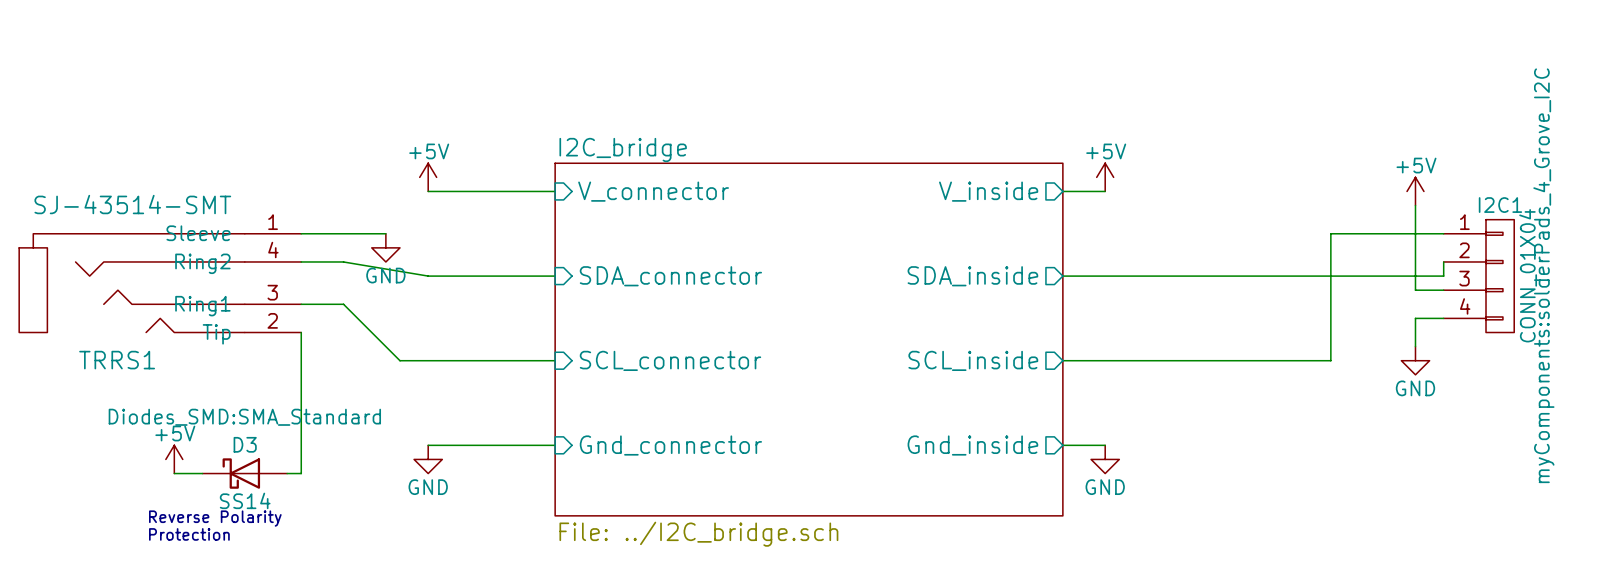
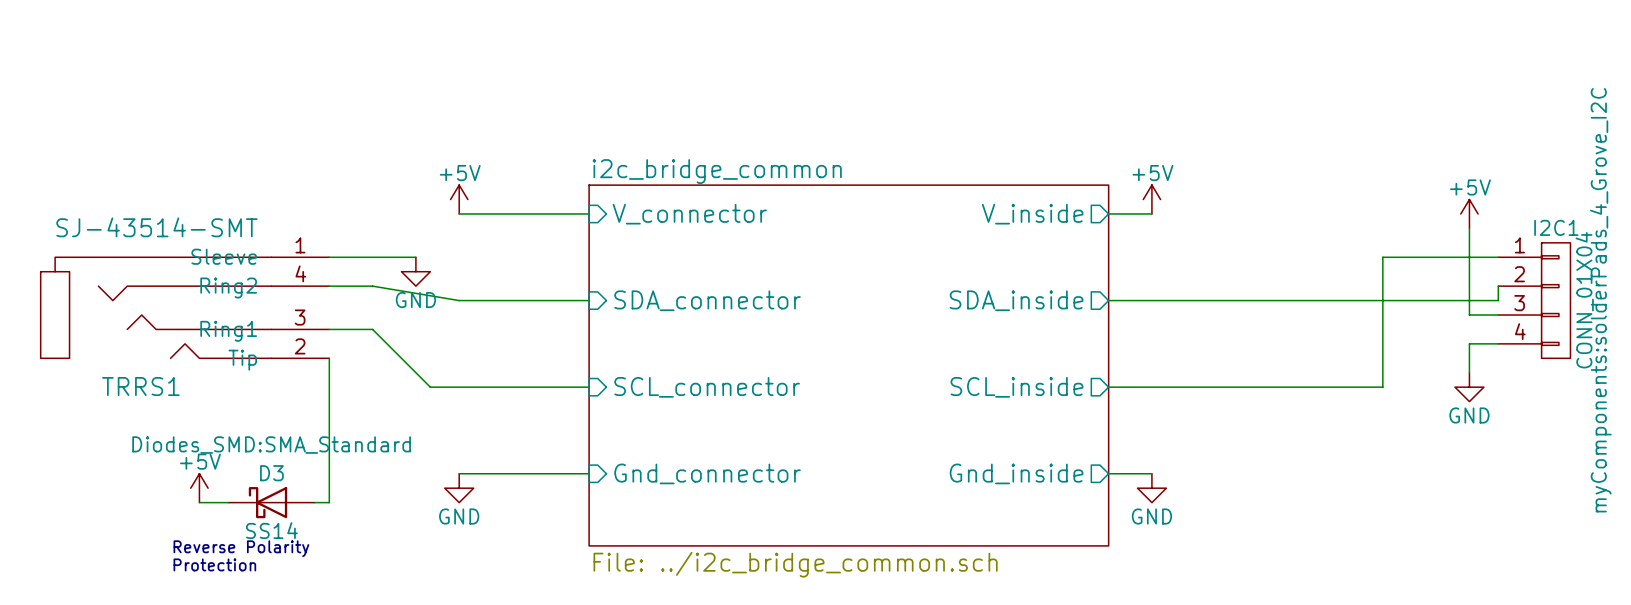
sheet I2C_bridge name: I2C_bridge (623, 149) -> i2c_bridge_common (717, 171)
sheet I2C_bridge value: File: ../I2C_bridge.sch (698, 534) -> File: ../i2c_bridge_common.sch (795, 564)

